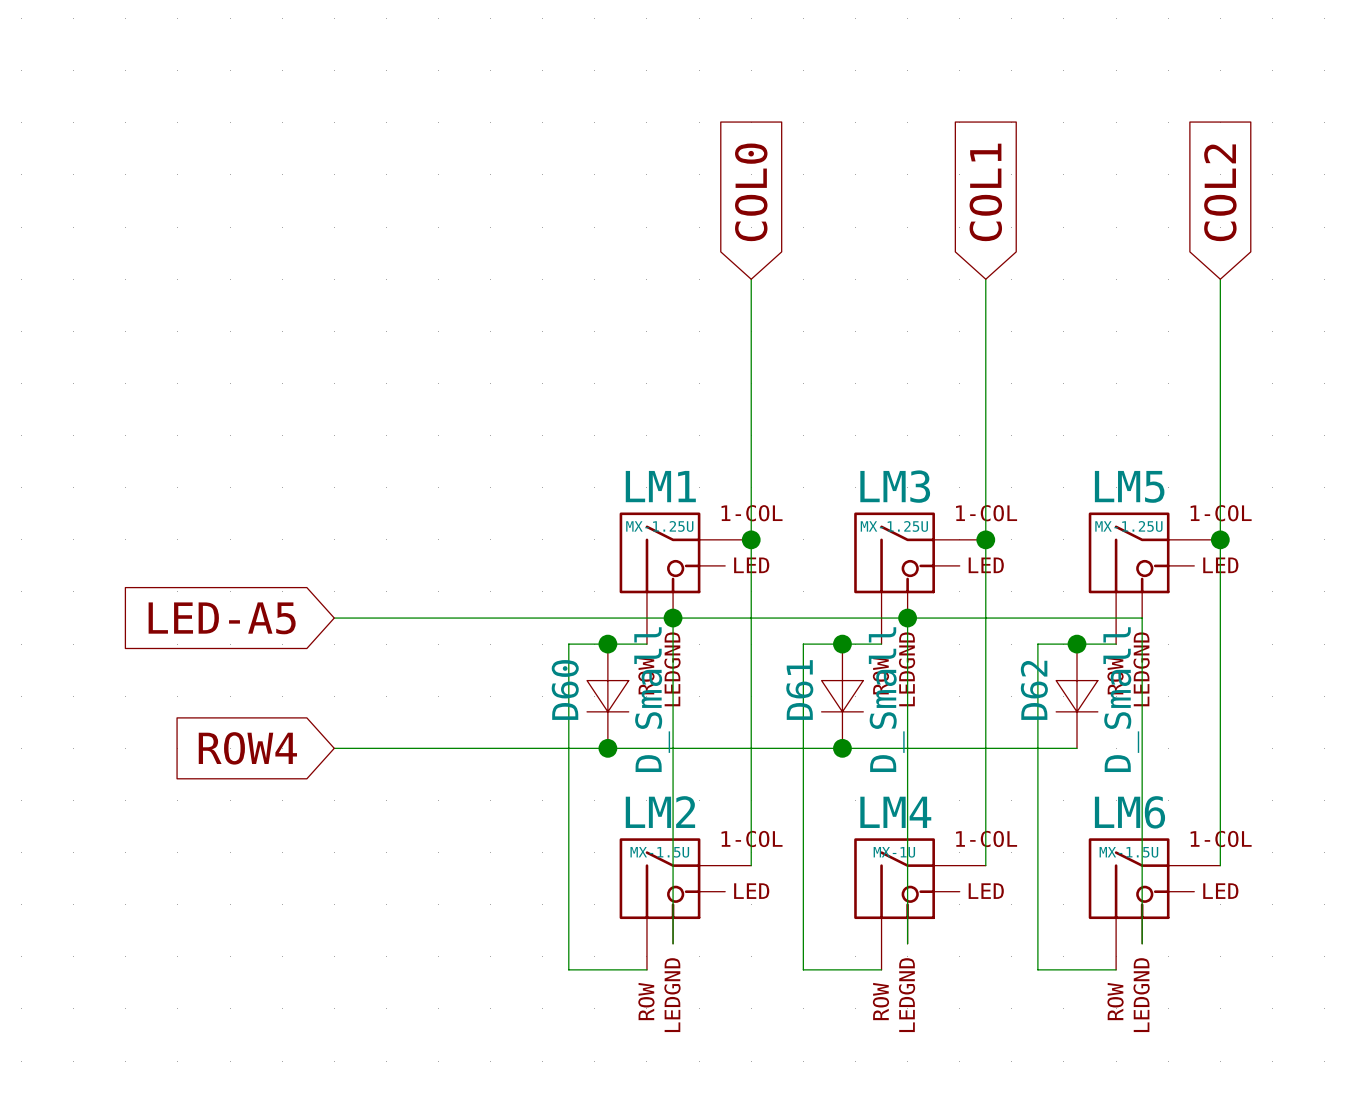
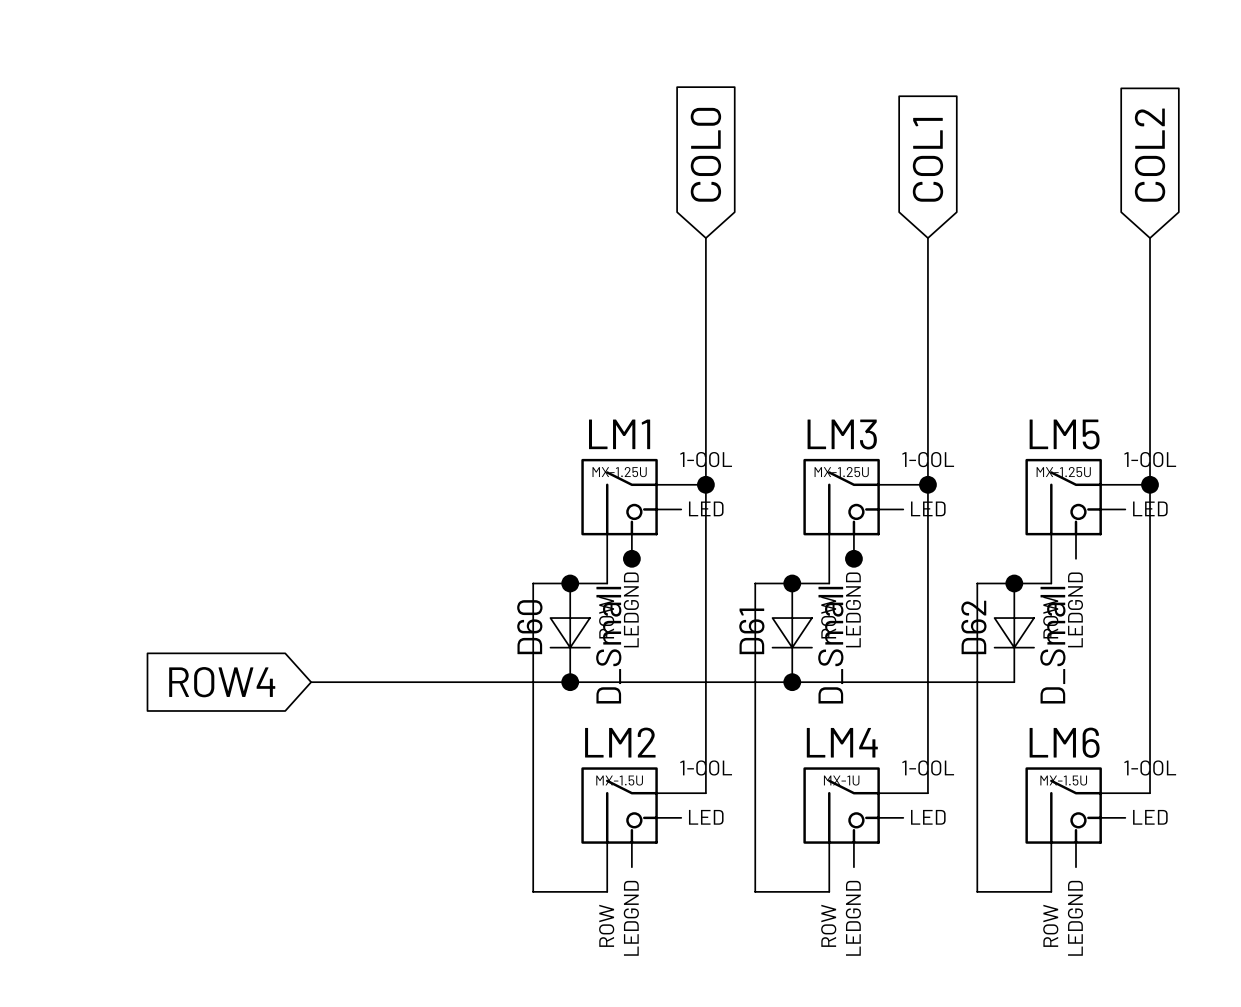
global label: LED-A5 (222, 618) -> none
wire: (334, 618) (1142, 618) (1142, 943) -> none
wire: (673, 618) (673, 943) -> none
wire: (907, 618) (907, 943) -> none

